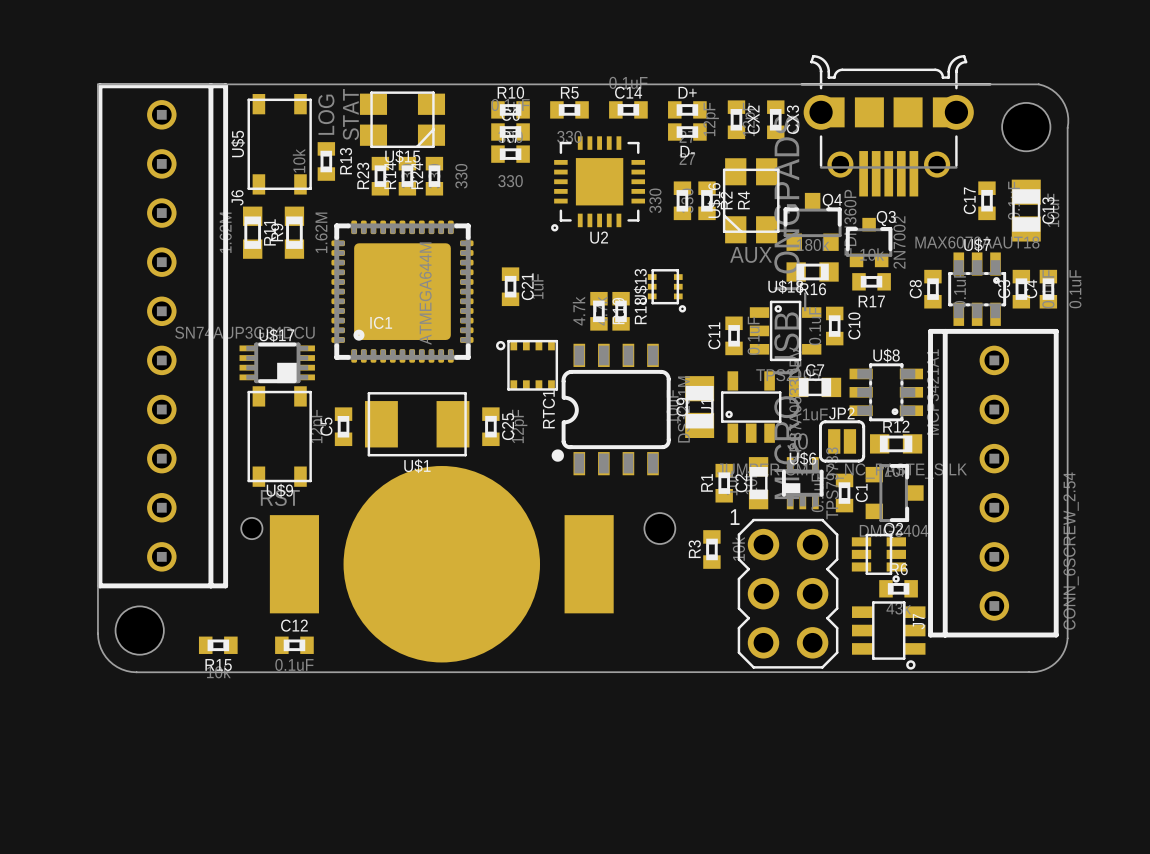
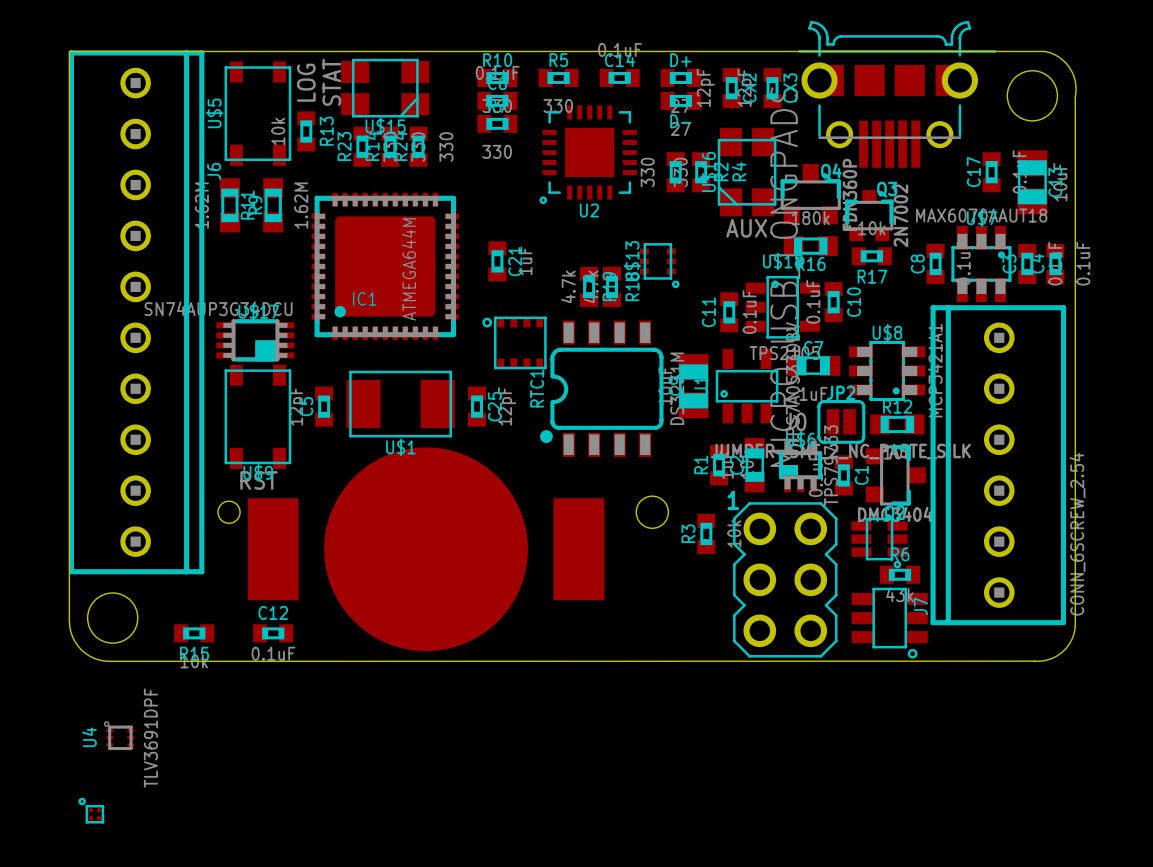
U4: none -> TLV3691DPF (119, 735)
part: none -> (91, 810)

